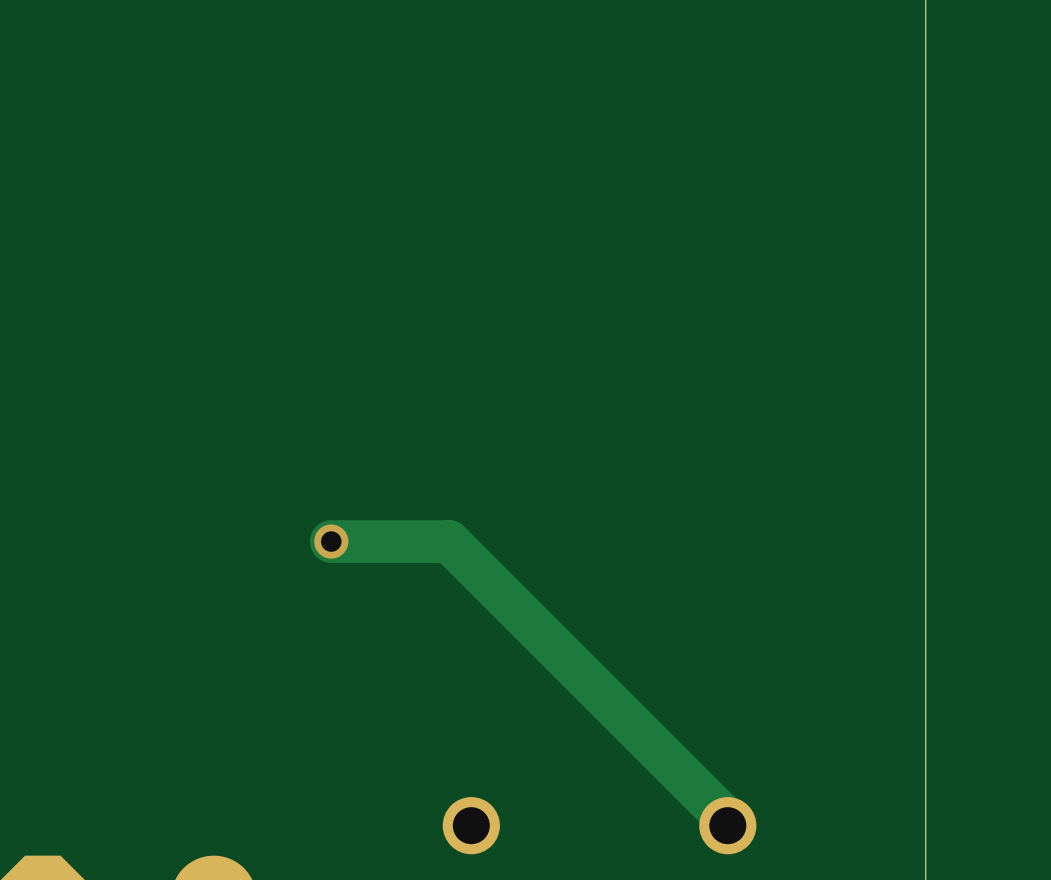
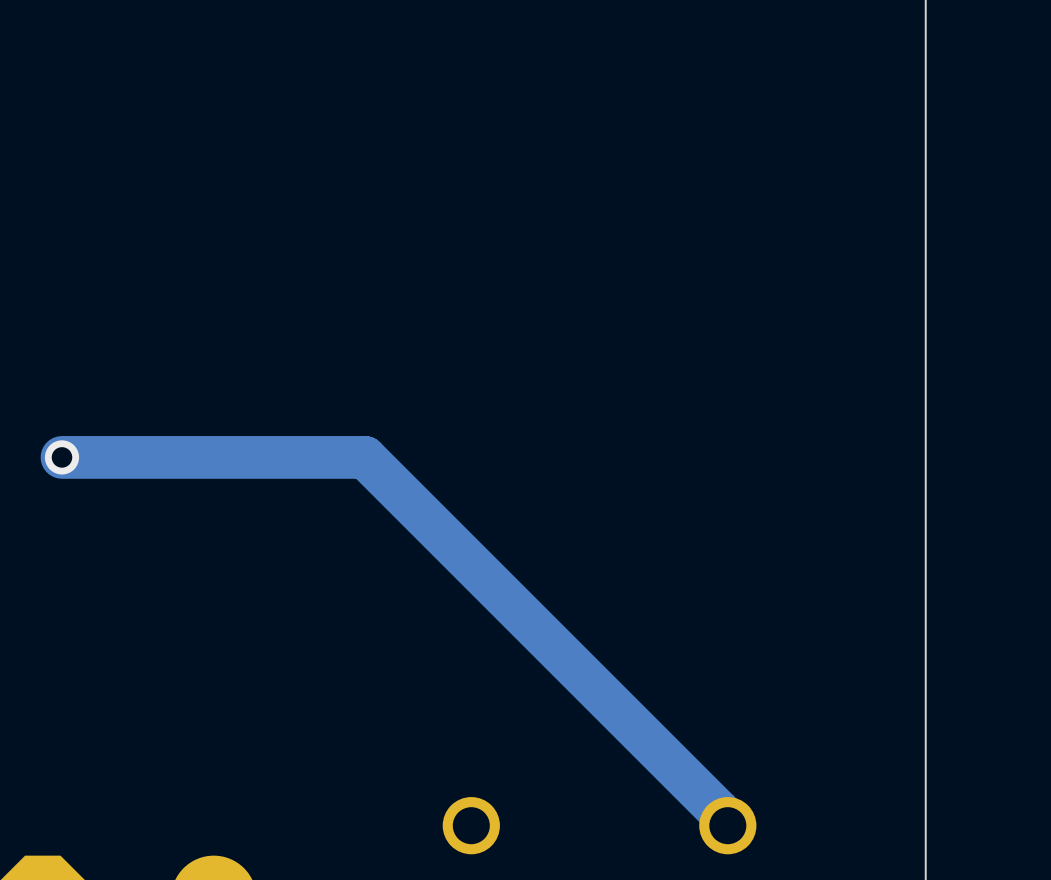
via: none -> (61, 457)
via: (331, 541) -> none
track: (449, 541) (331, 541) -> (449, 541) (364, 457) (61, 457)

